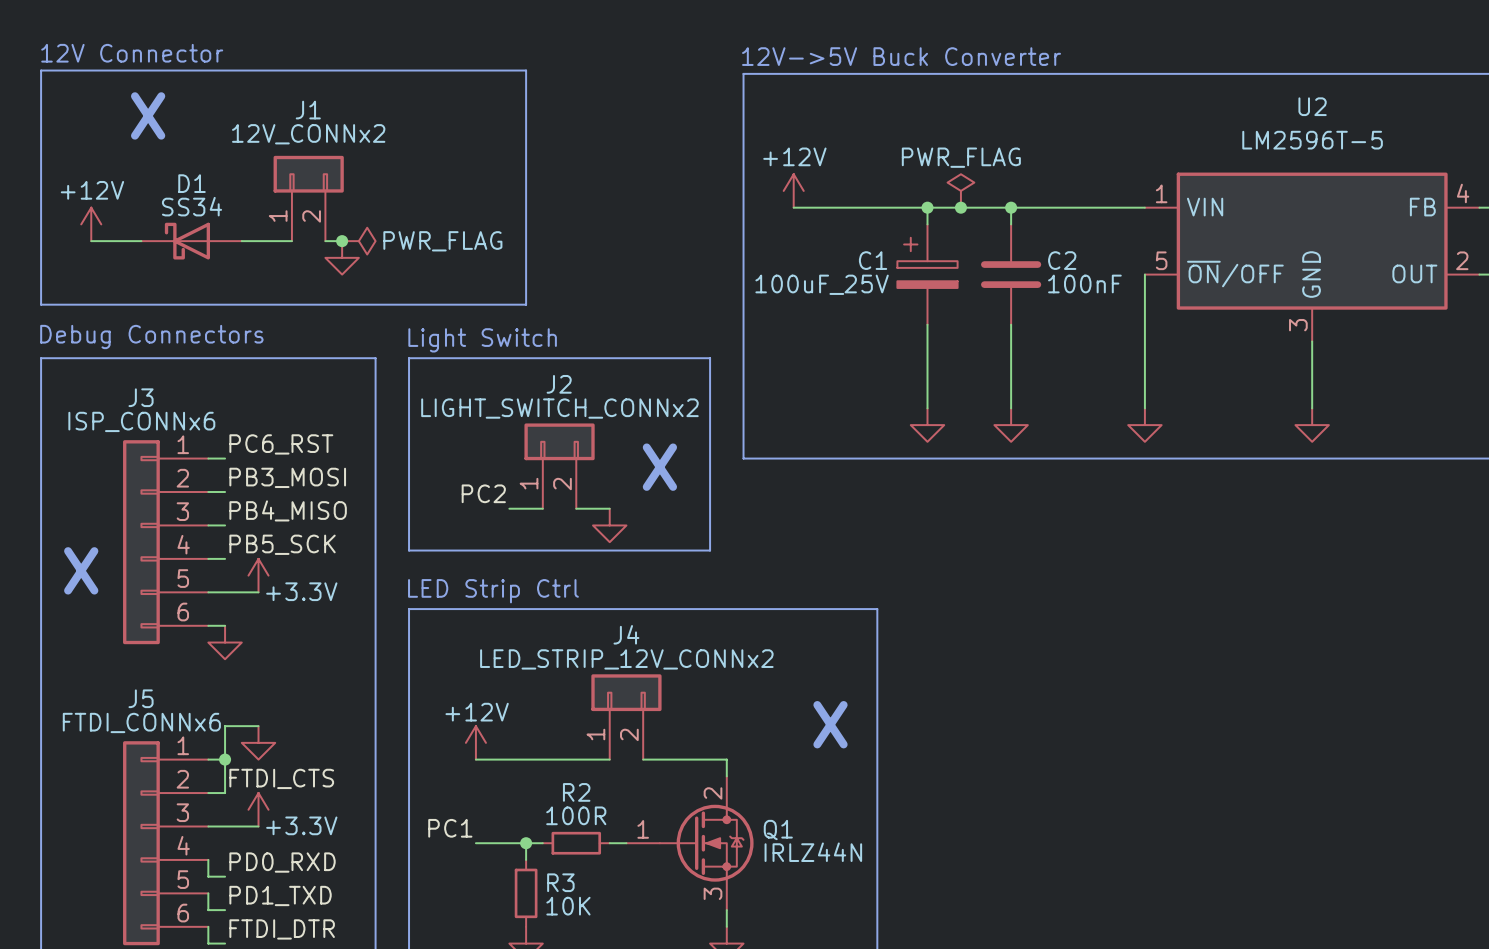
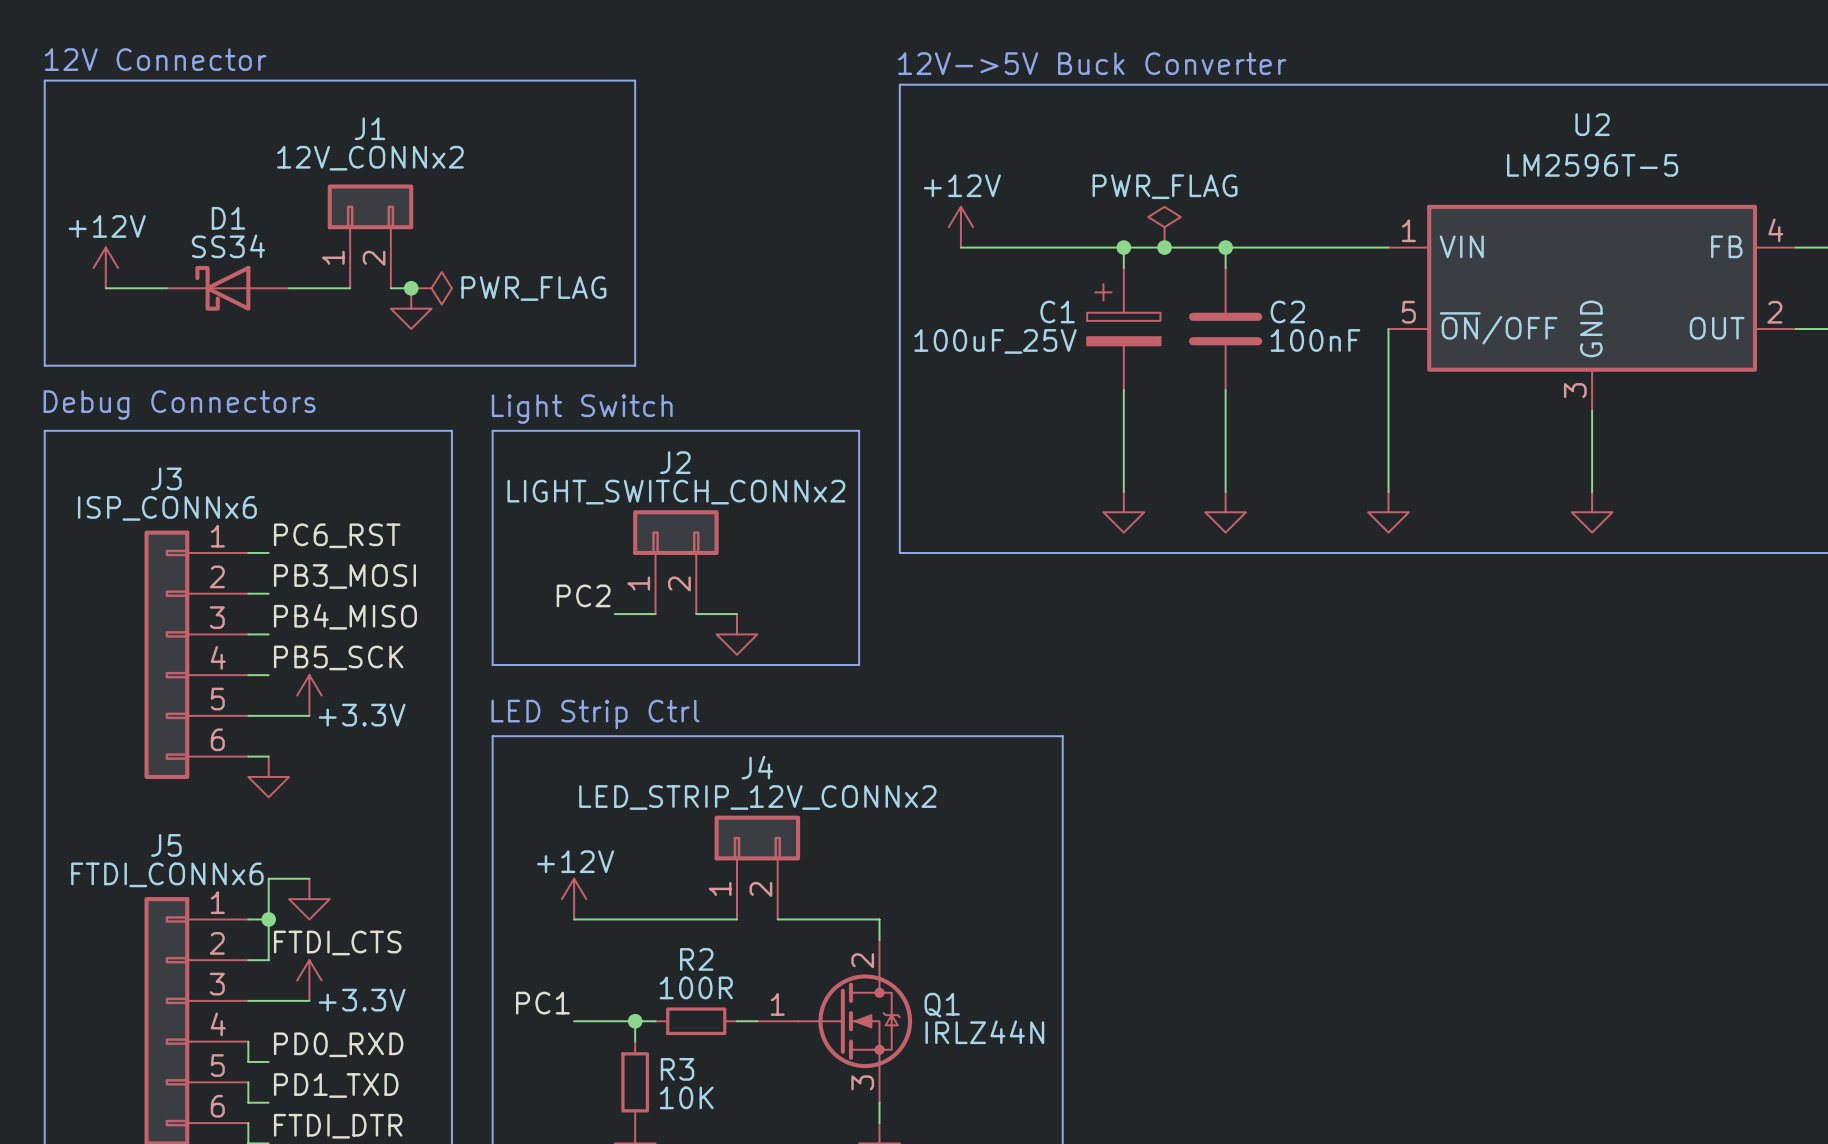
text: X (148, 115) -> none
text: X (659, 467) -> none
text: X (81, 570) -> none
text: X (830, 724) -> none

